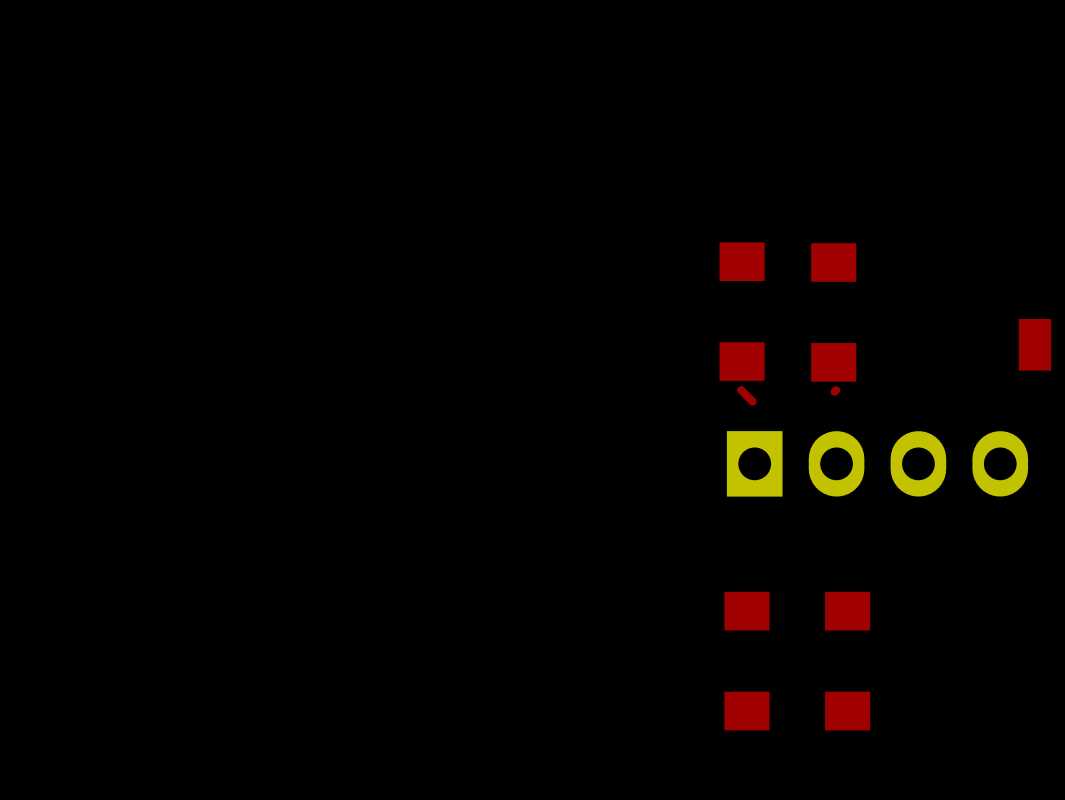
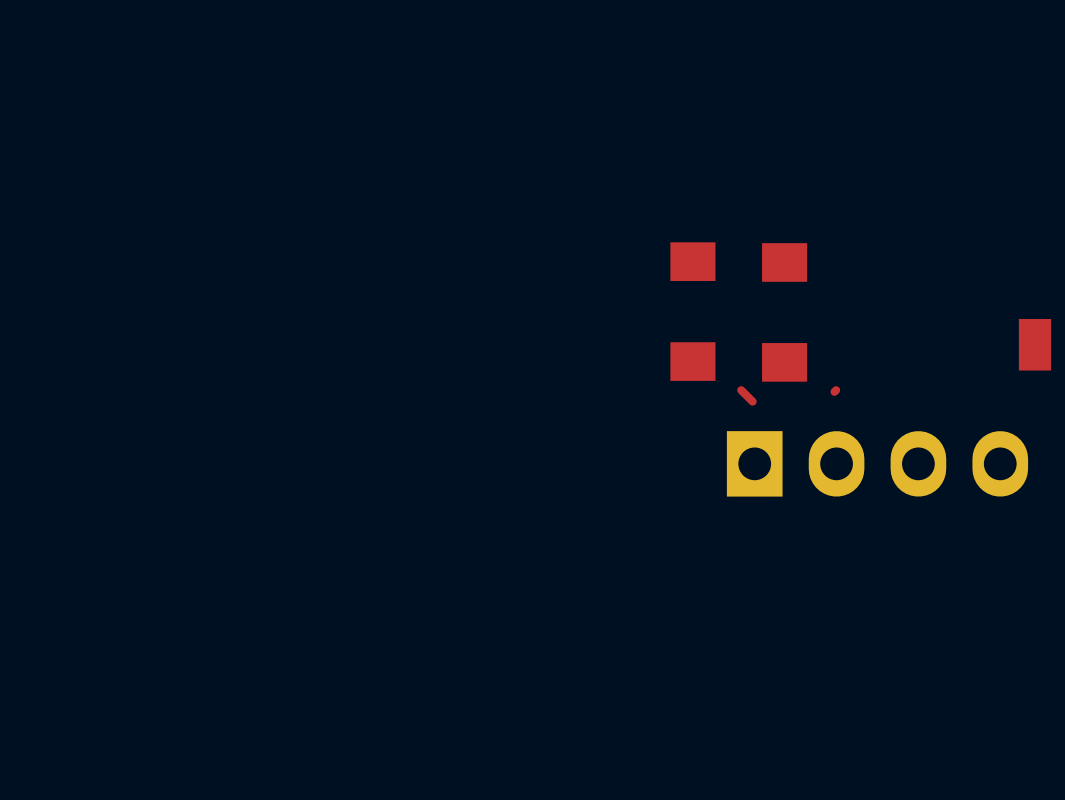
part: none -> (692, 311)
part: (742, 311) -> none
part: none -> (784, 312)
part: (833, 312) -> none
part: (746, 661) -> none
part: (847, 661) -> none

